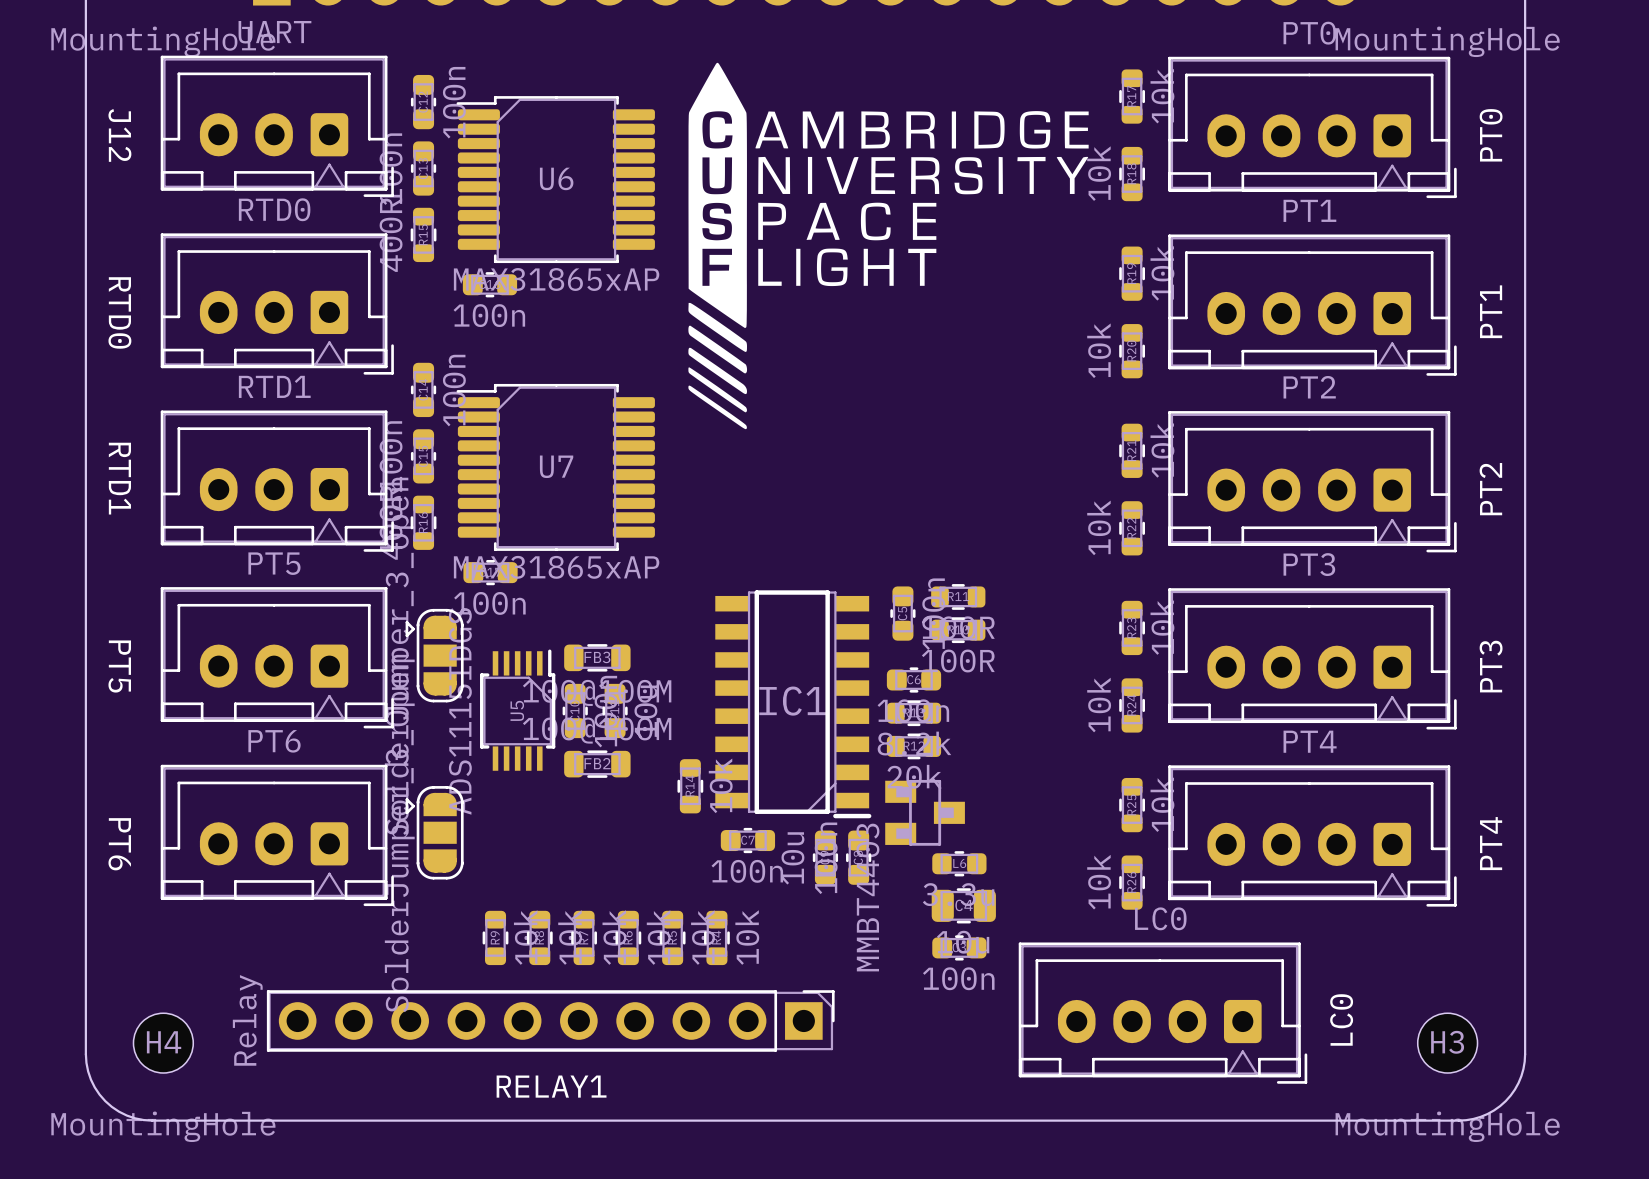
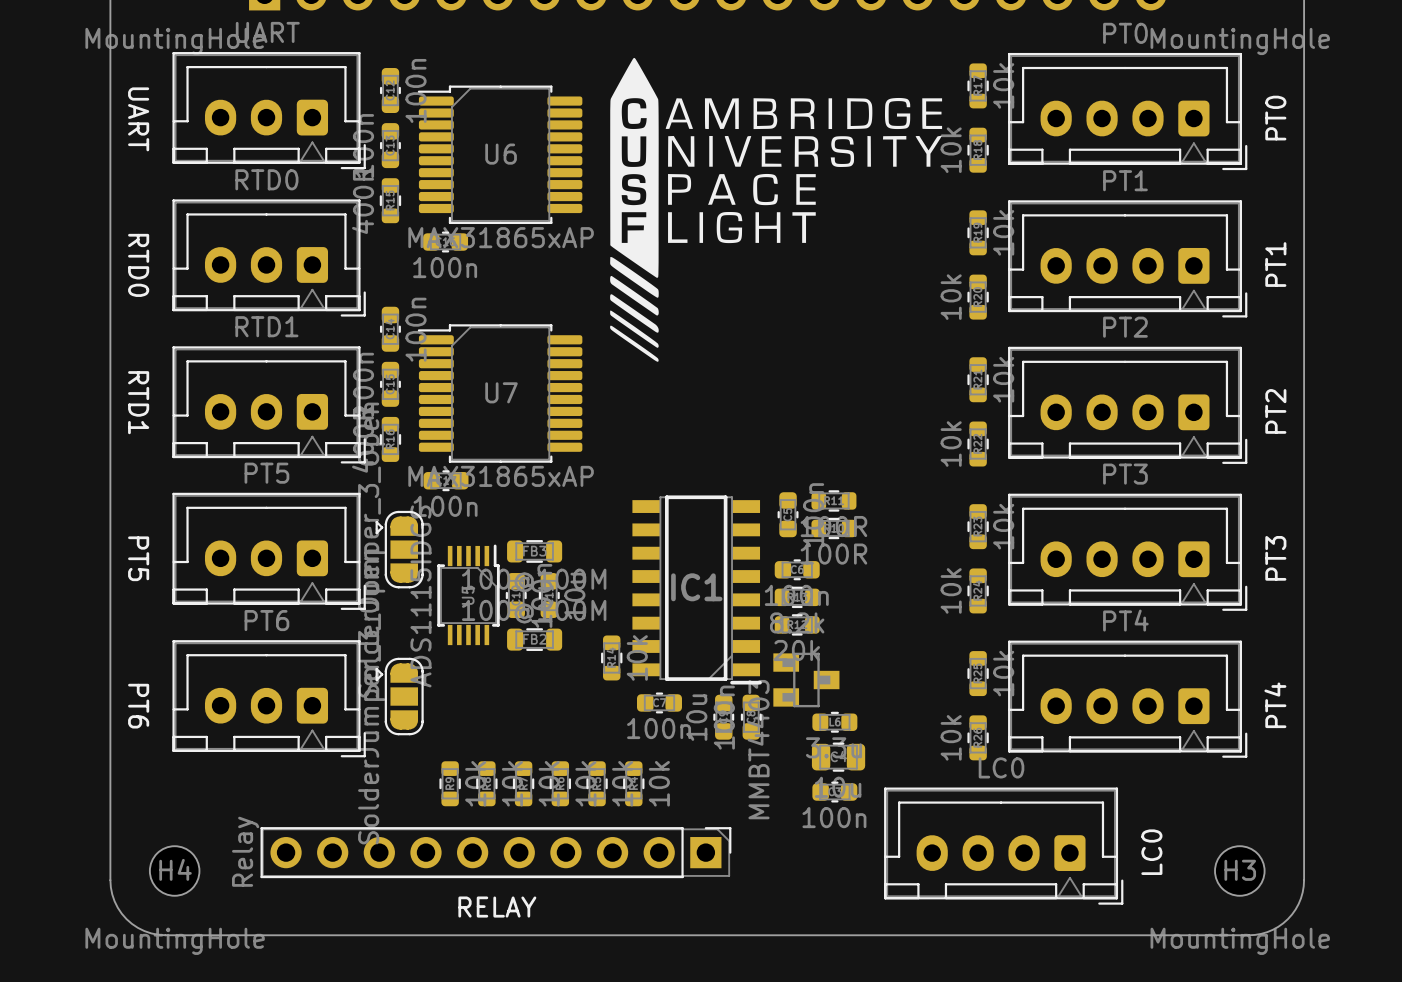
J12 name: J12 (119, 135) -> UART (138, 119)
RELAY1 name: RELAY1 (551, 1086) -> RELAY (497, 907)

